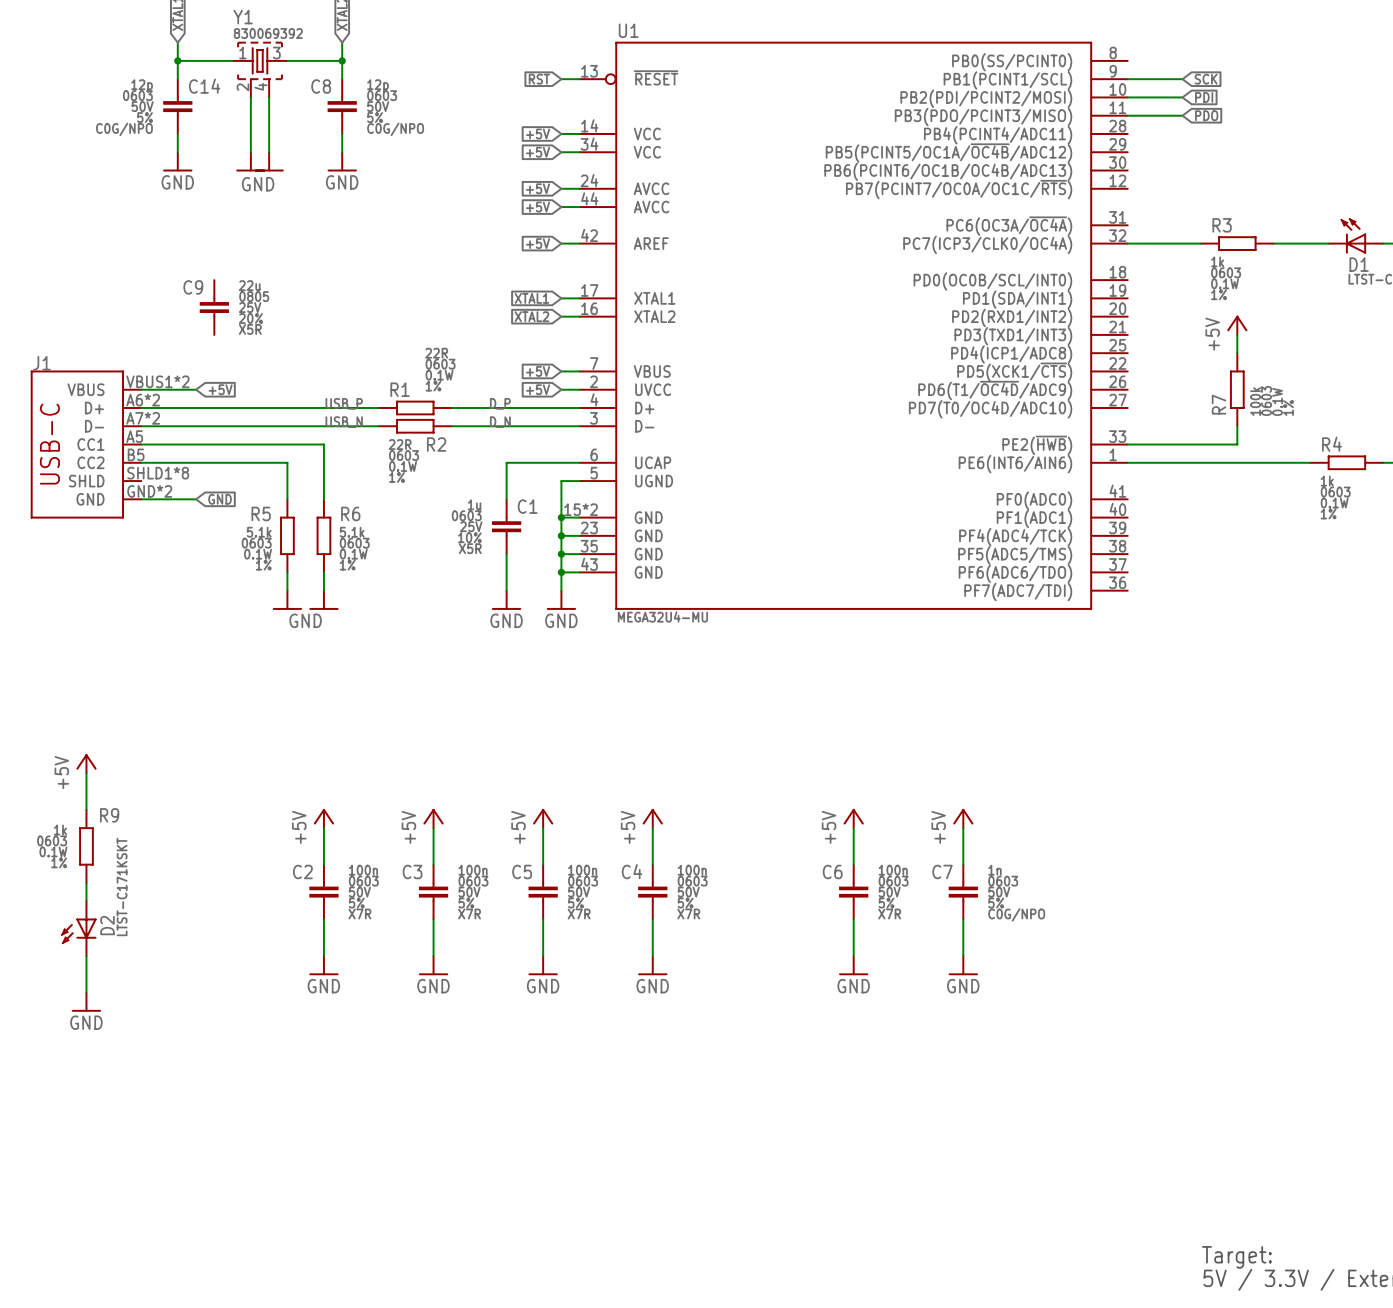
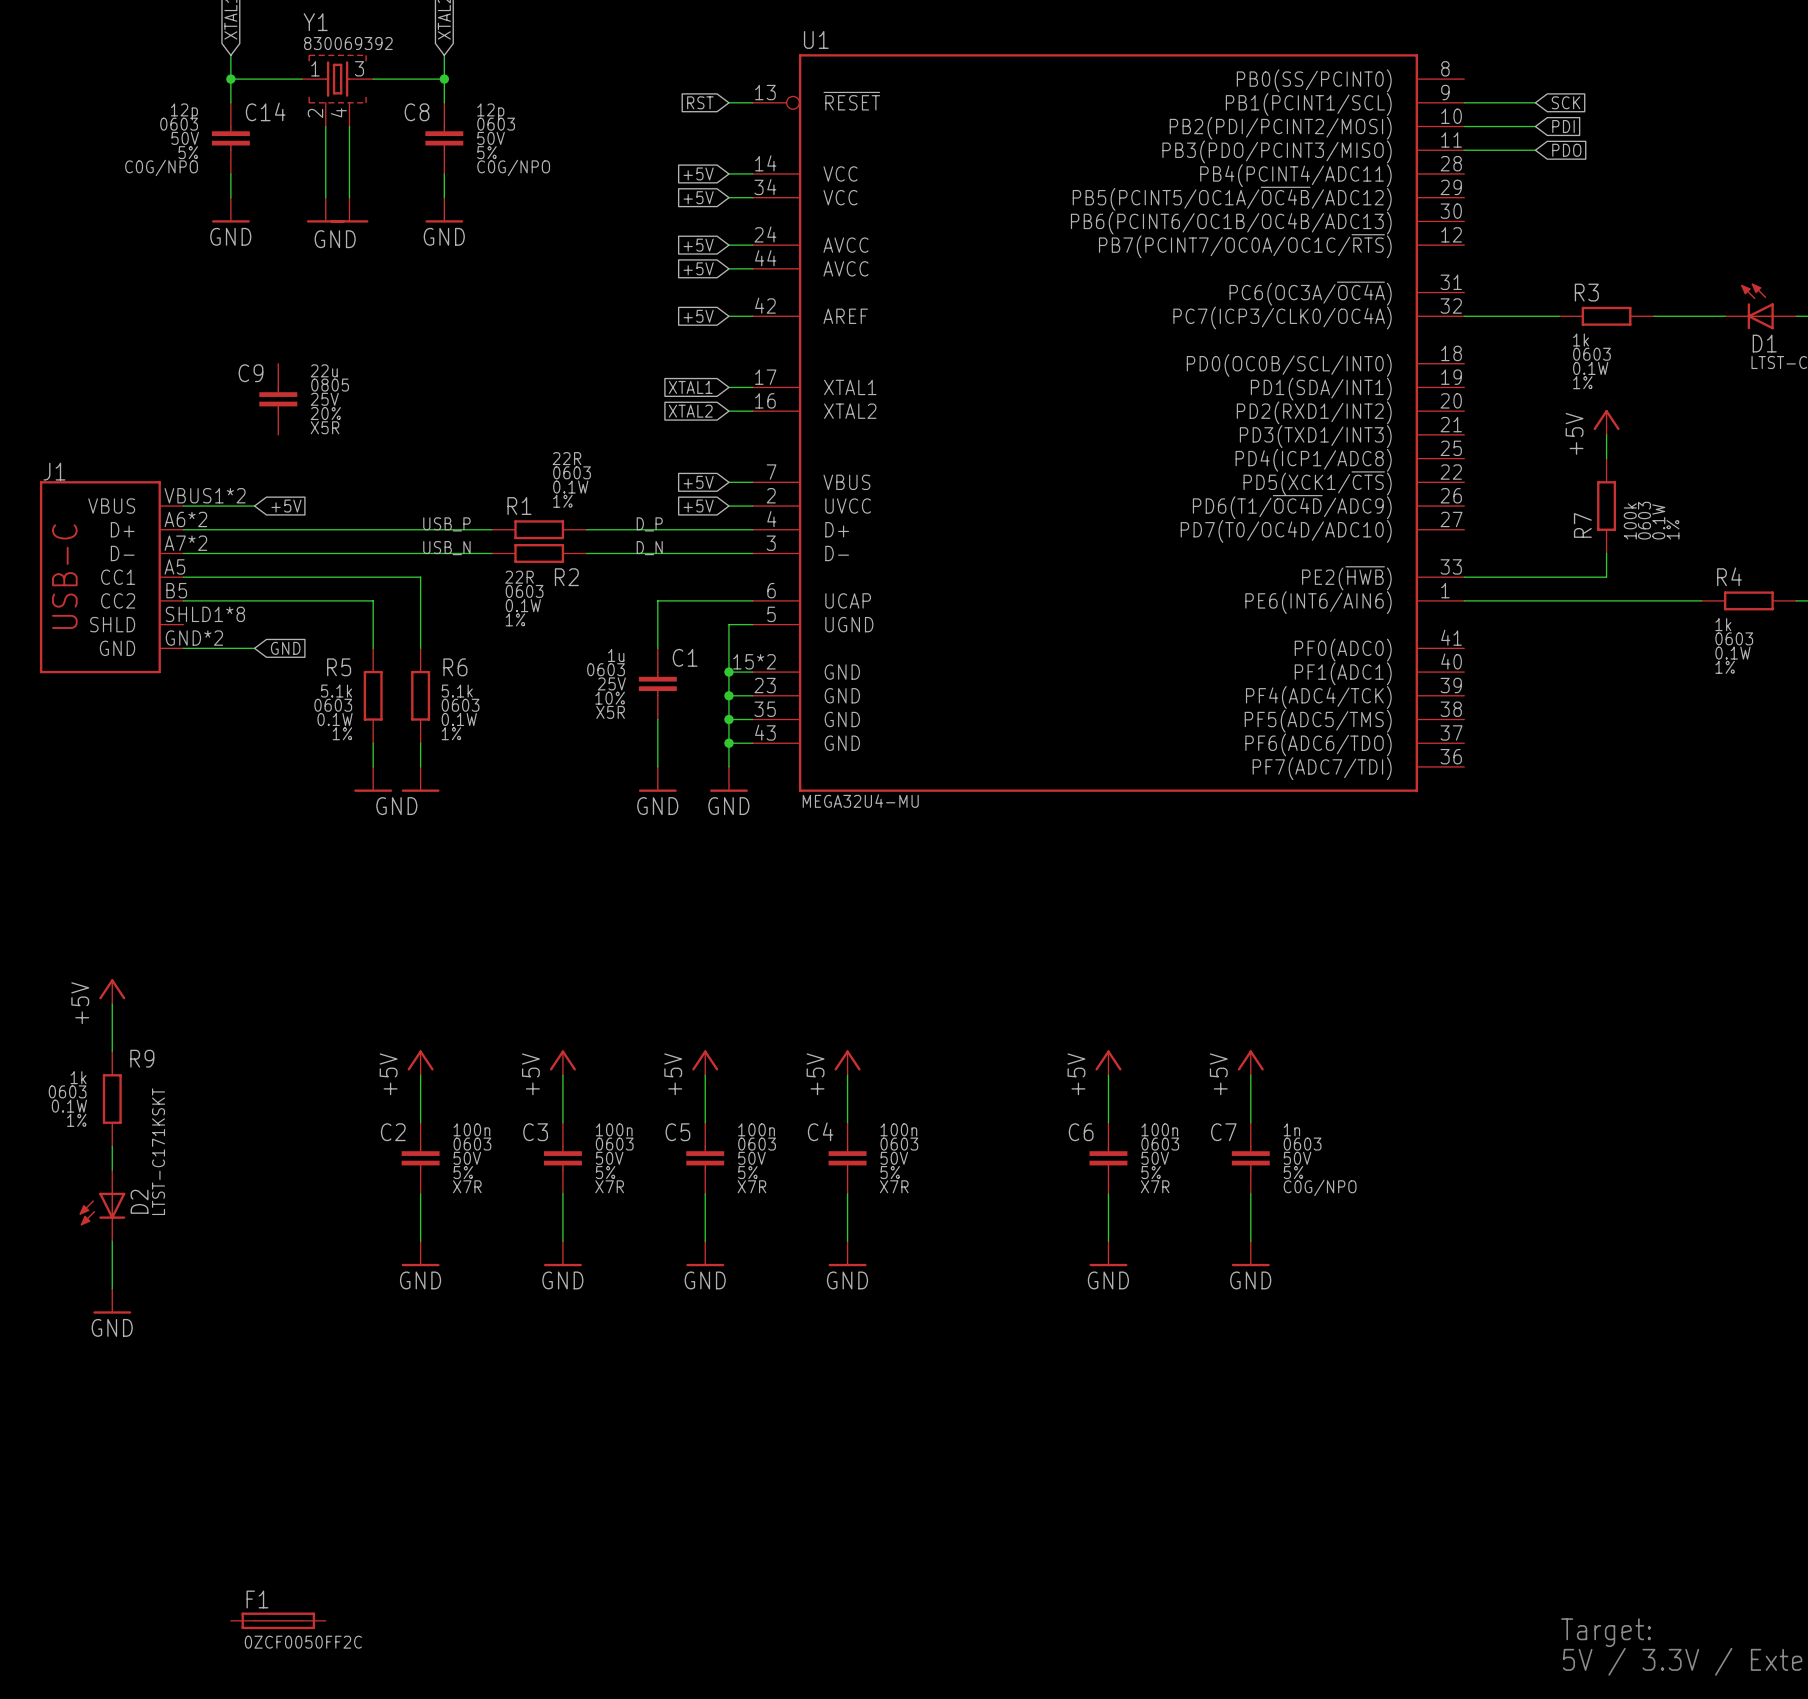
F1: none -> 0ZCF0050FF2C (278, 1620)

